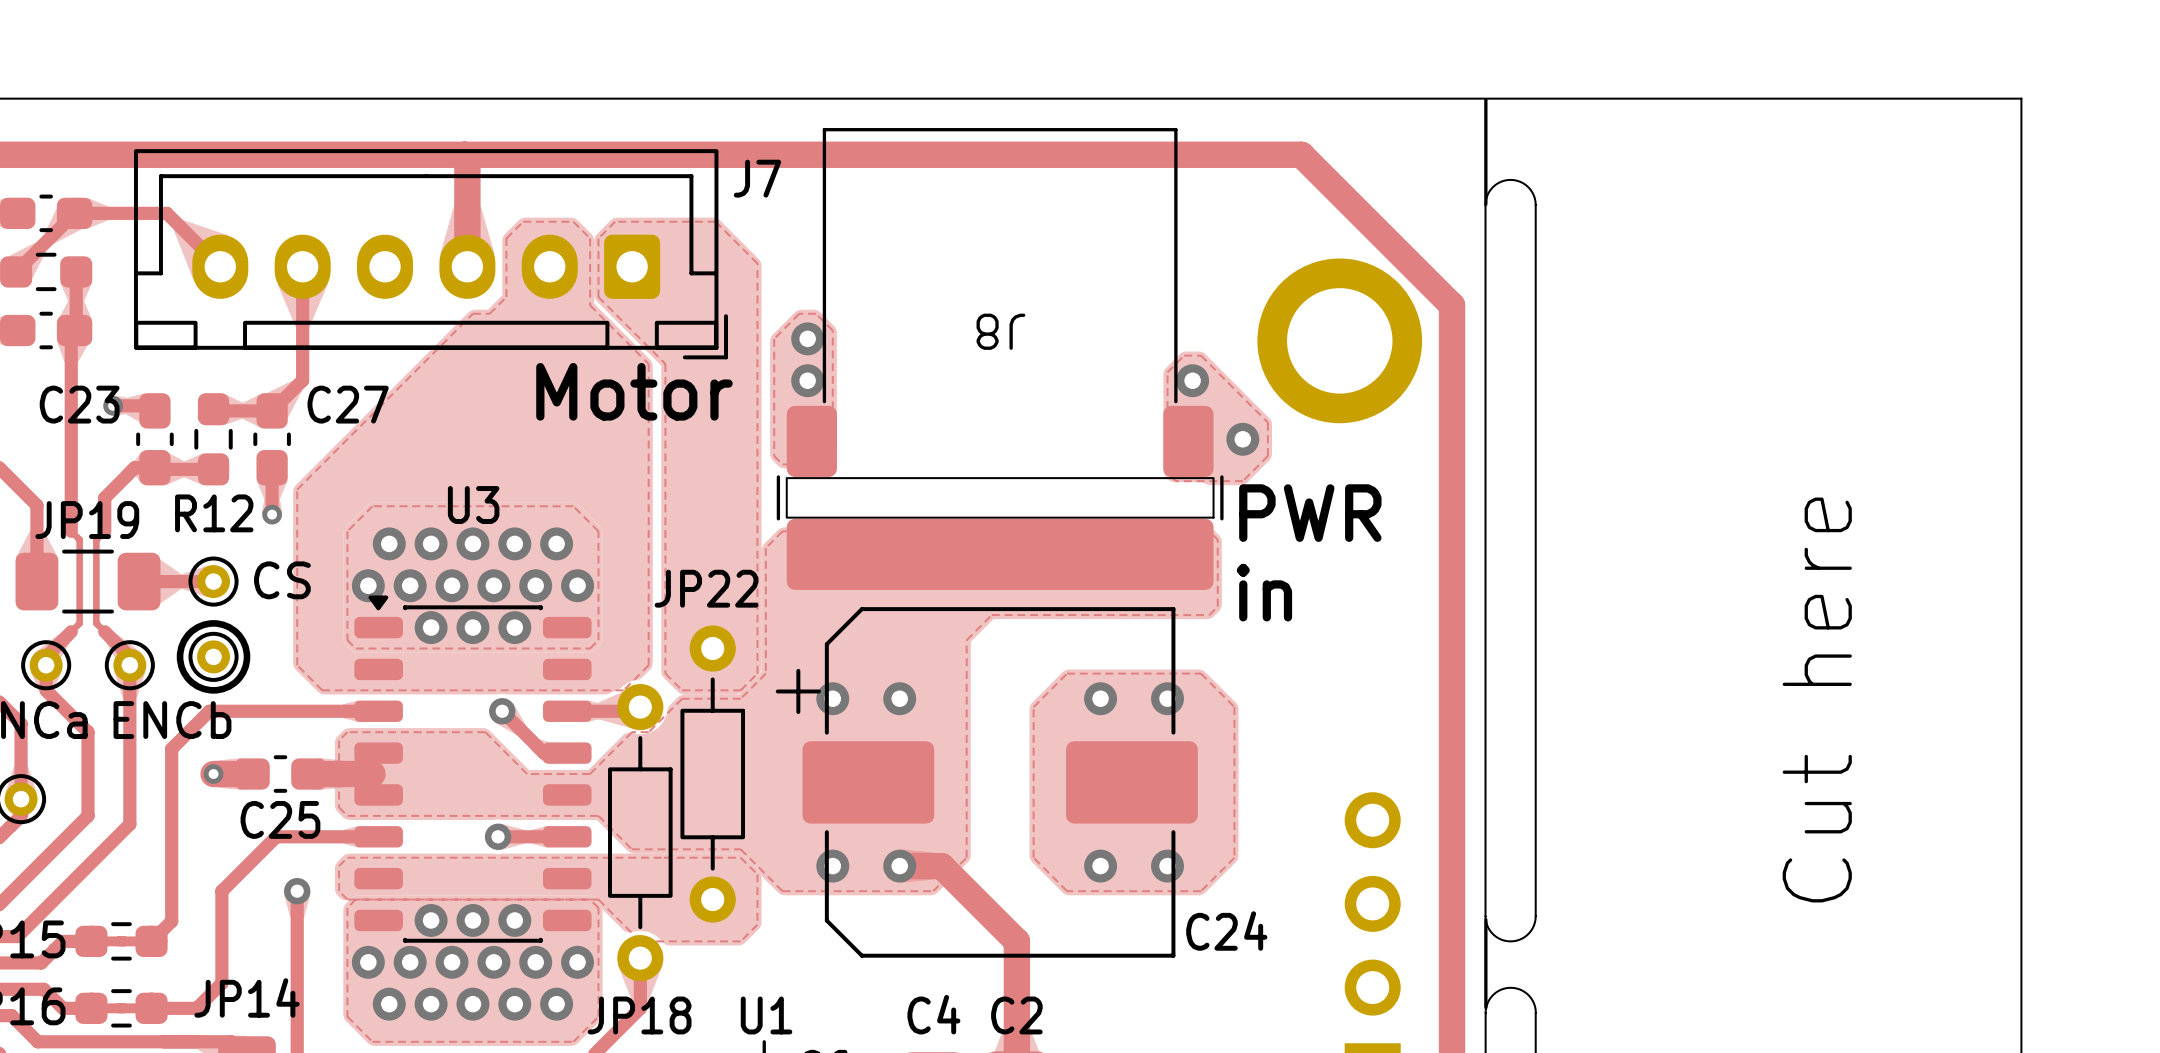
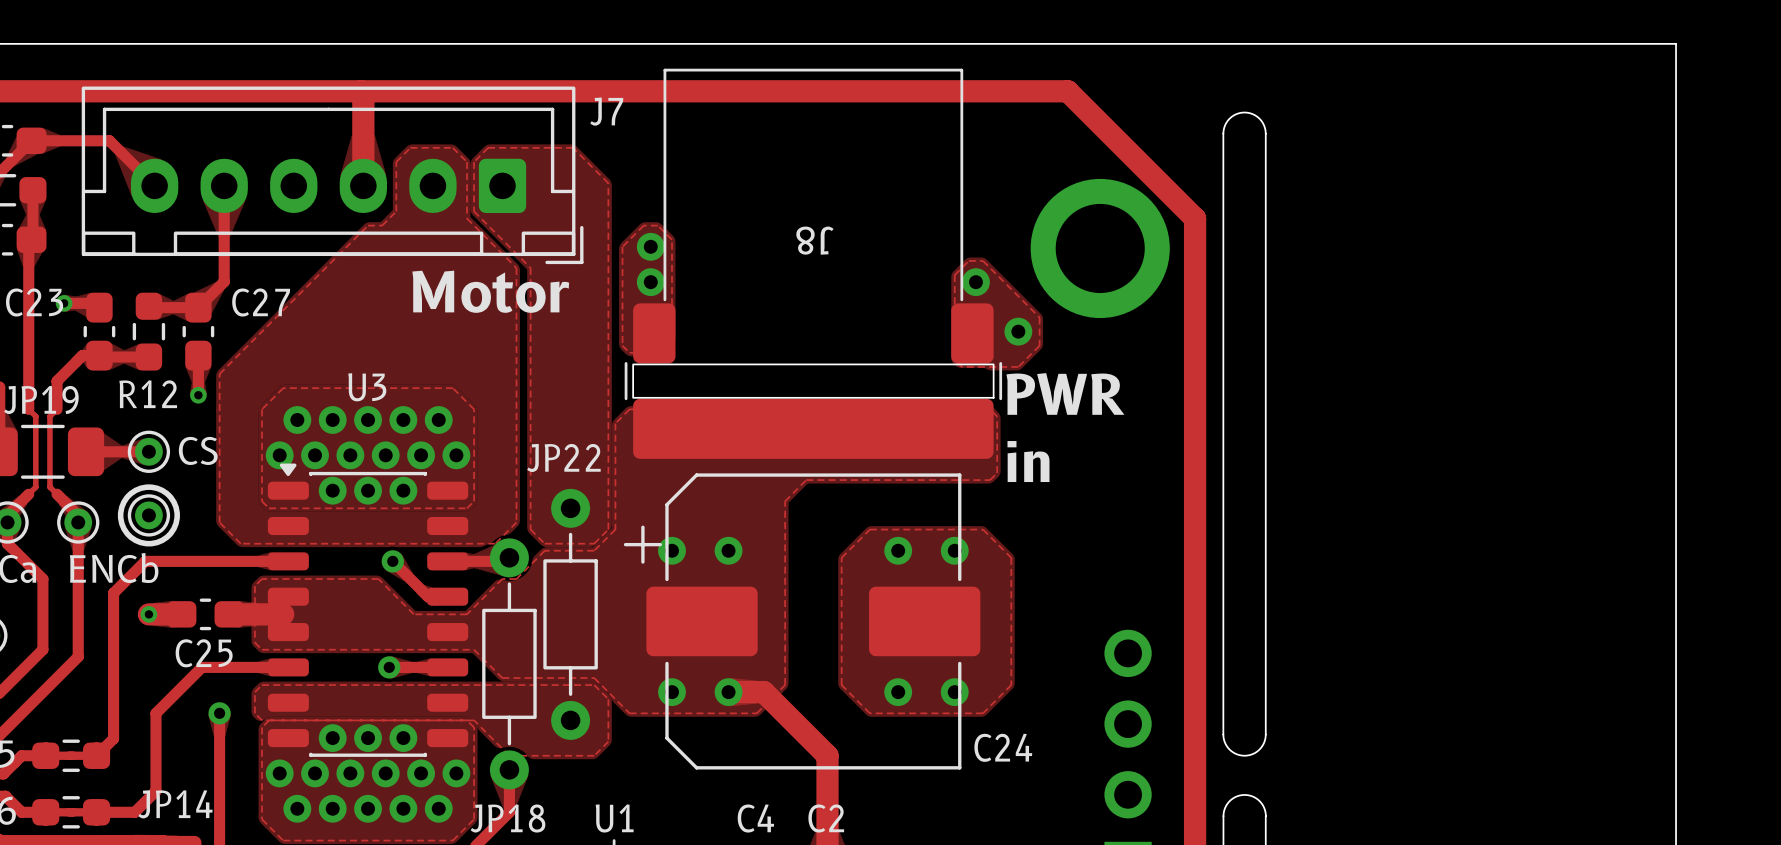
line: (1485, 99) (1485, 204) -> none
text: Cut here (1817, 700) -> none
line: (1485, 919) (1485, 1007) -> none

